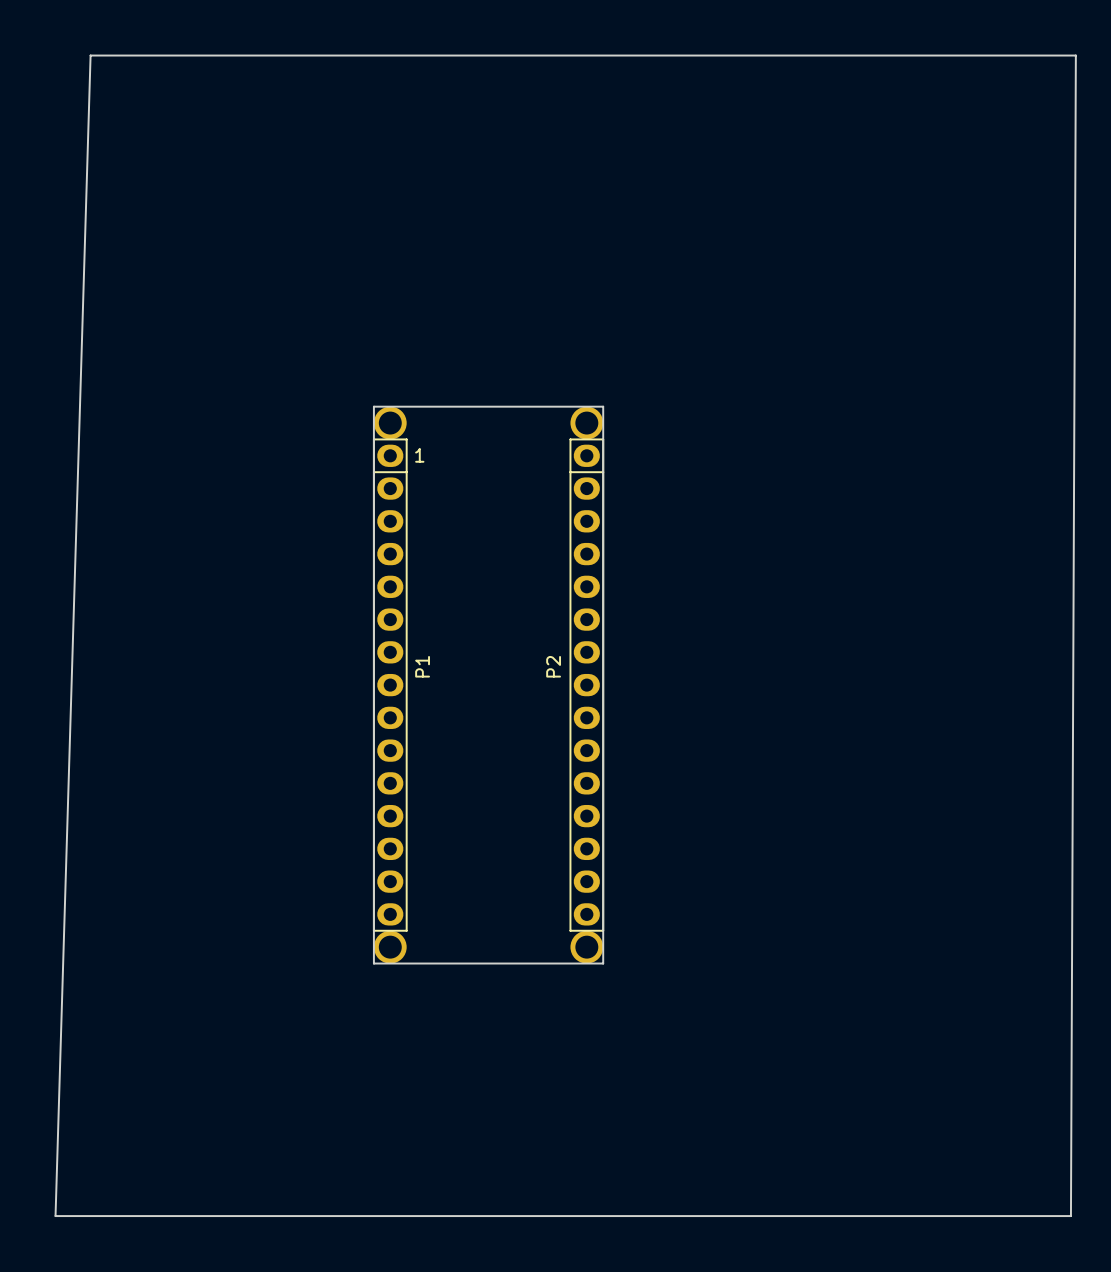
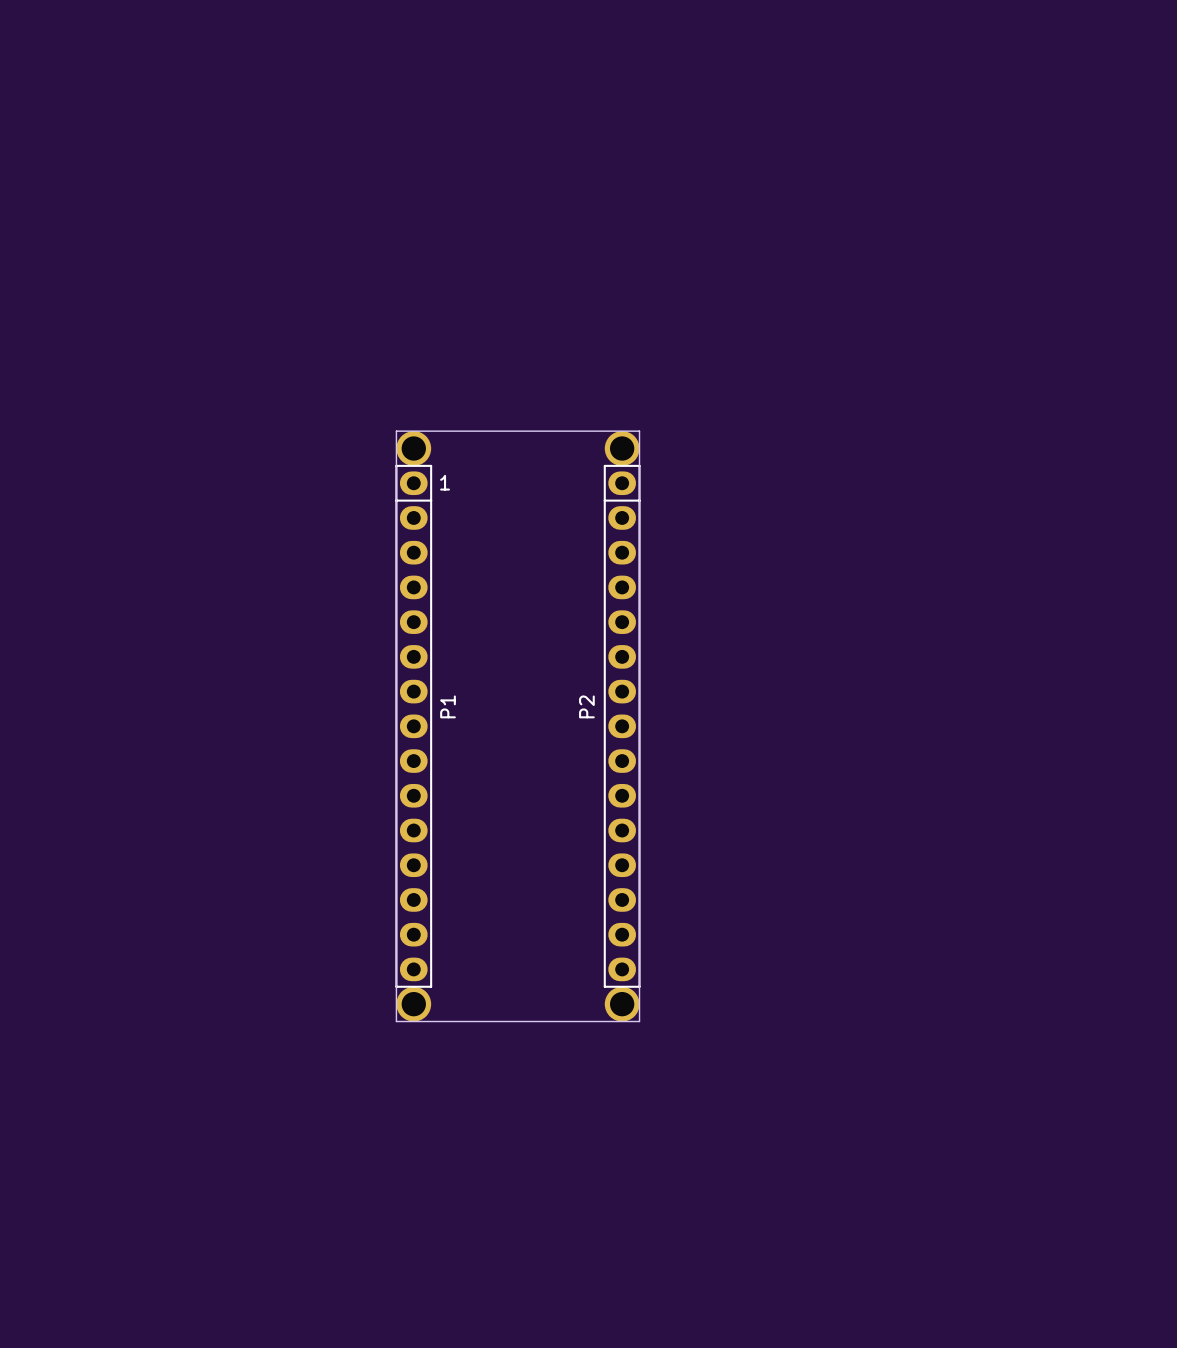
board edge: (90, 55) (55, 1216) (1070, 1216) (1075, 55) (90, 55) -> none

